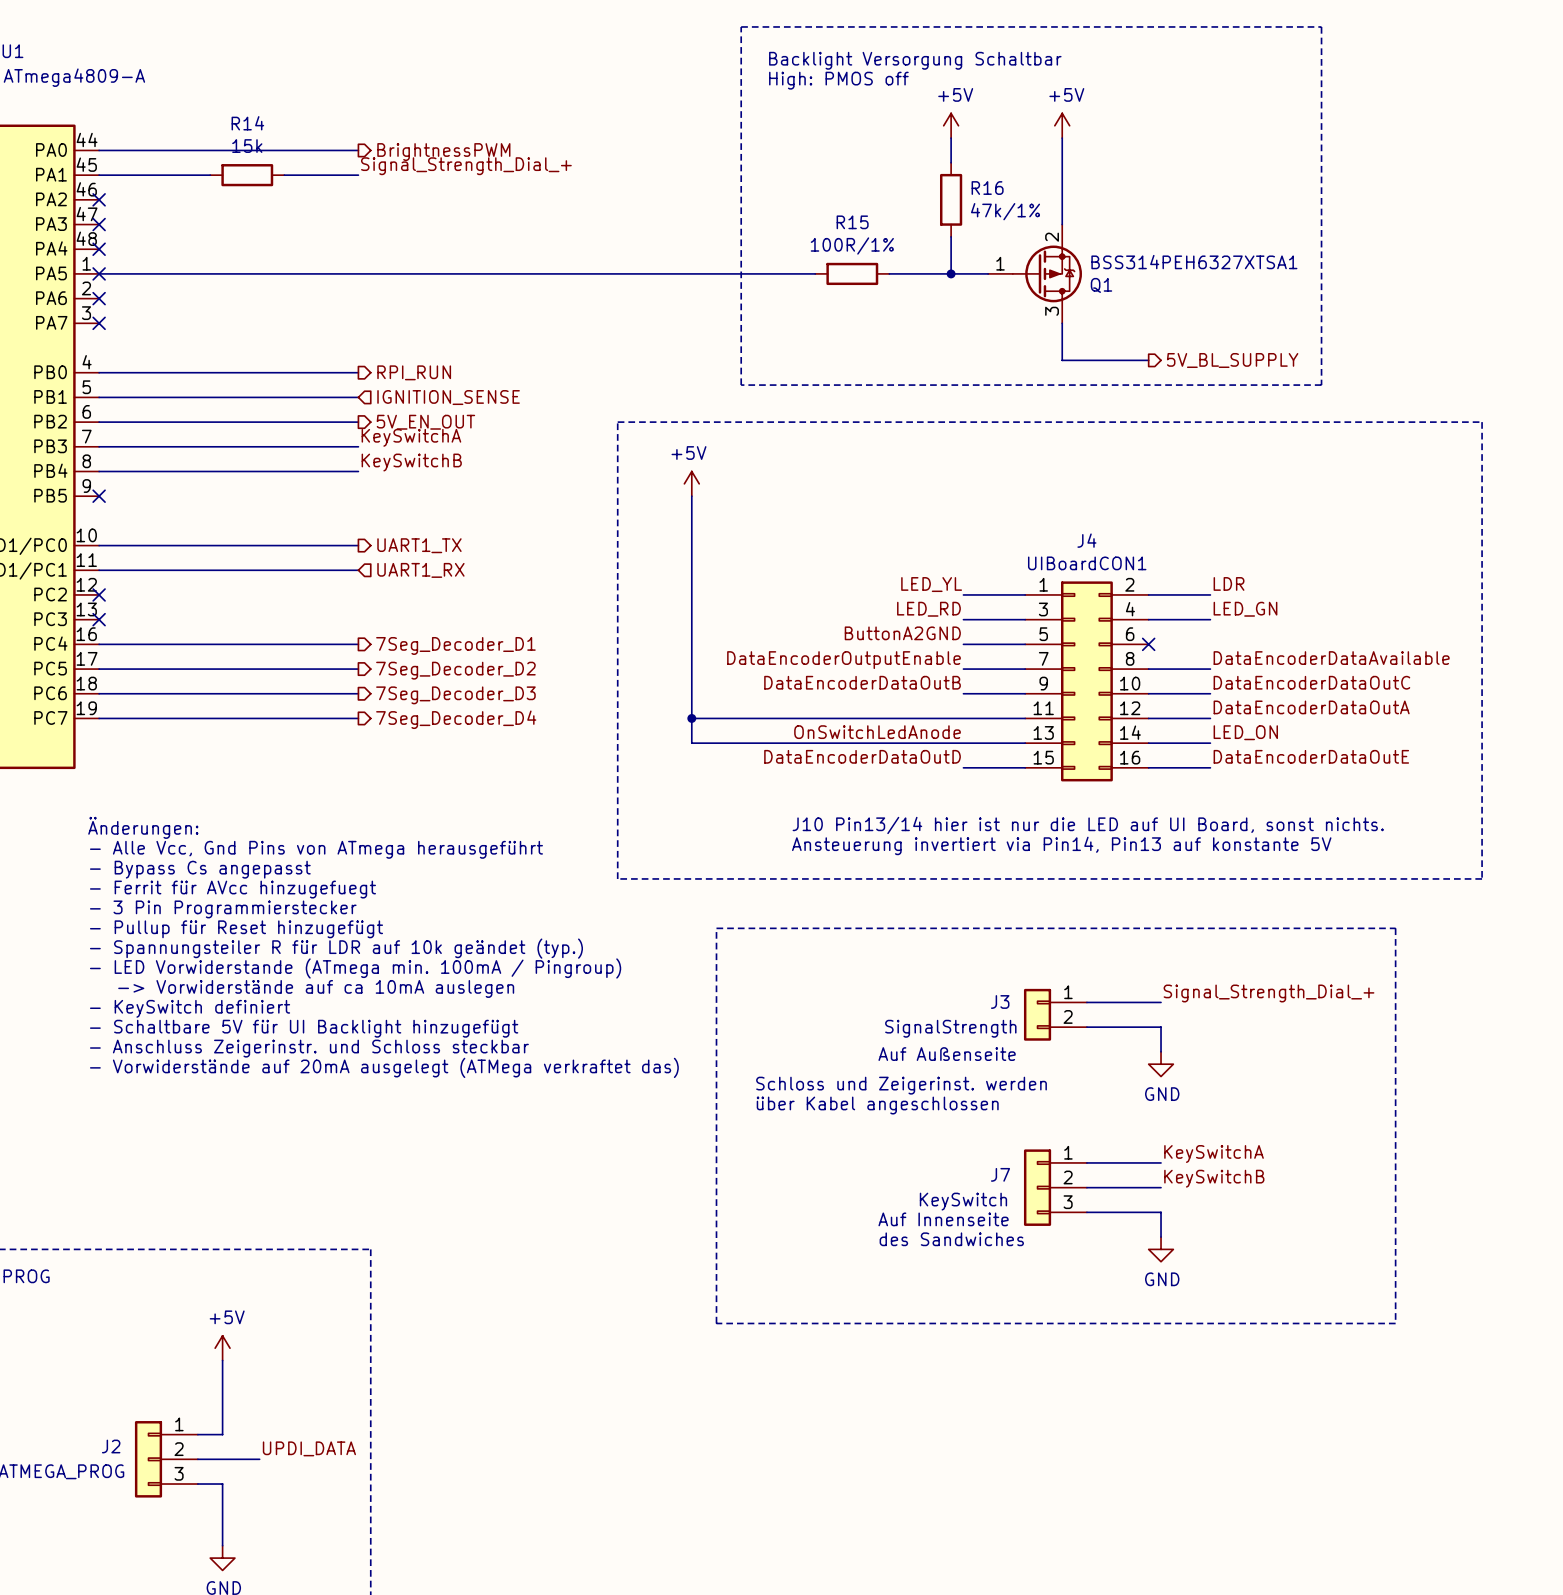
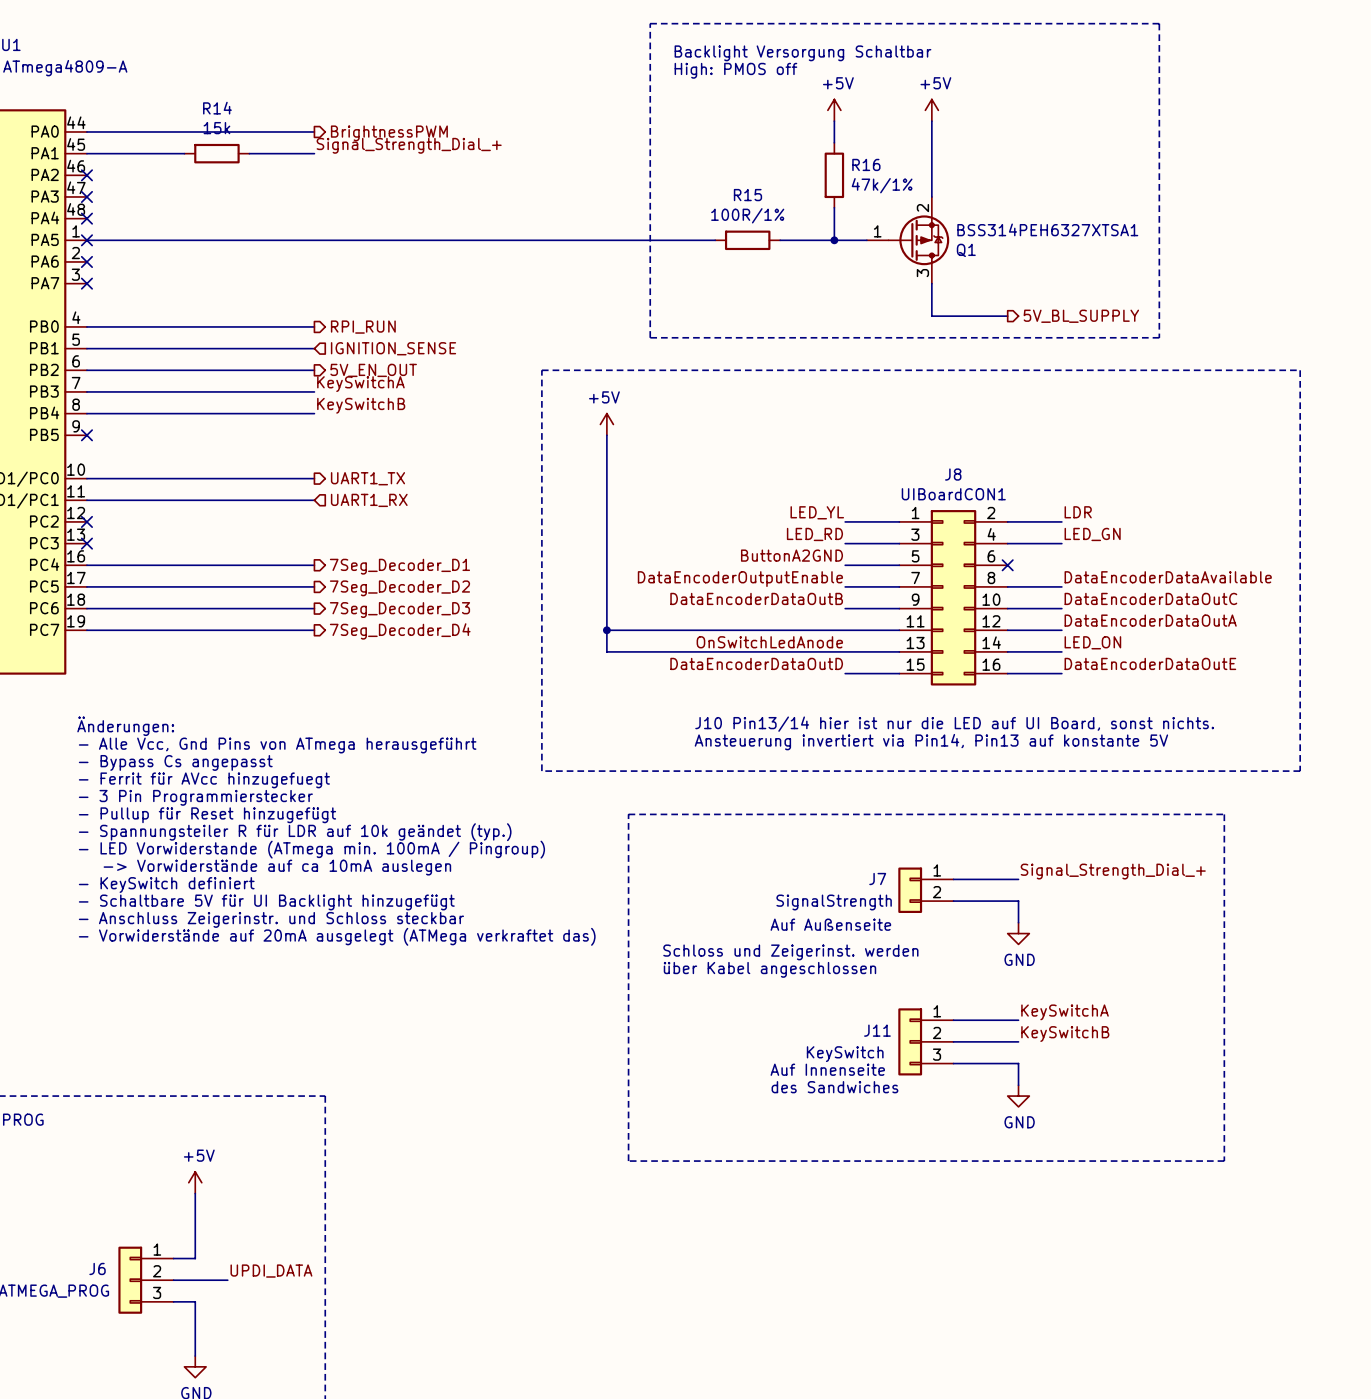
J4 name: J4 (1086, 540) -> J8 (953, 474)
J3 name: J3 (1000, 1001) -> J7 (877, 879)
J7 name: J7 (1000, 1174) -> J11 (877, 1030)
J2 name: J2 (111, 1446) -> J6 (97, 1268)

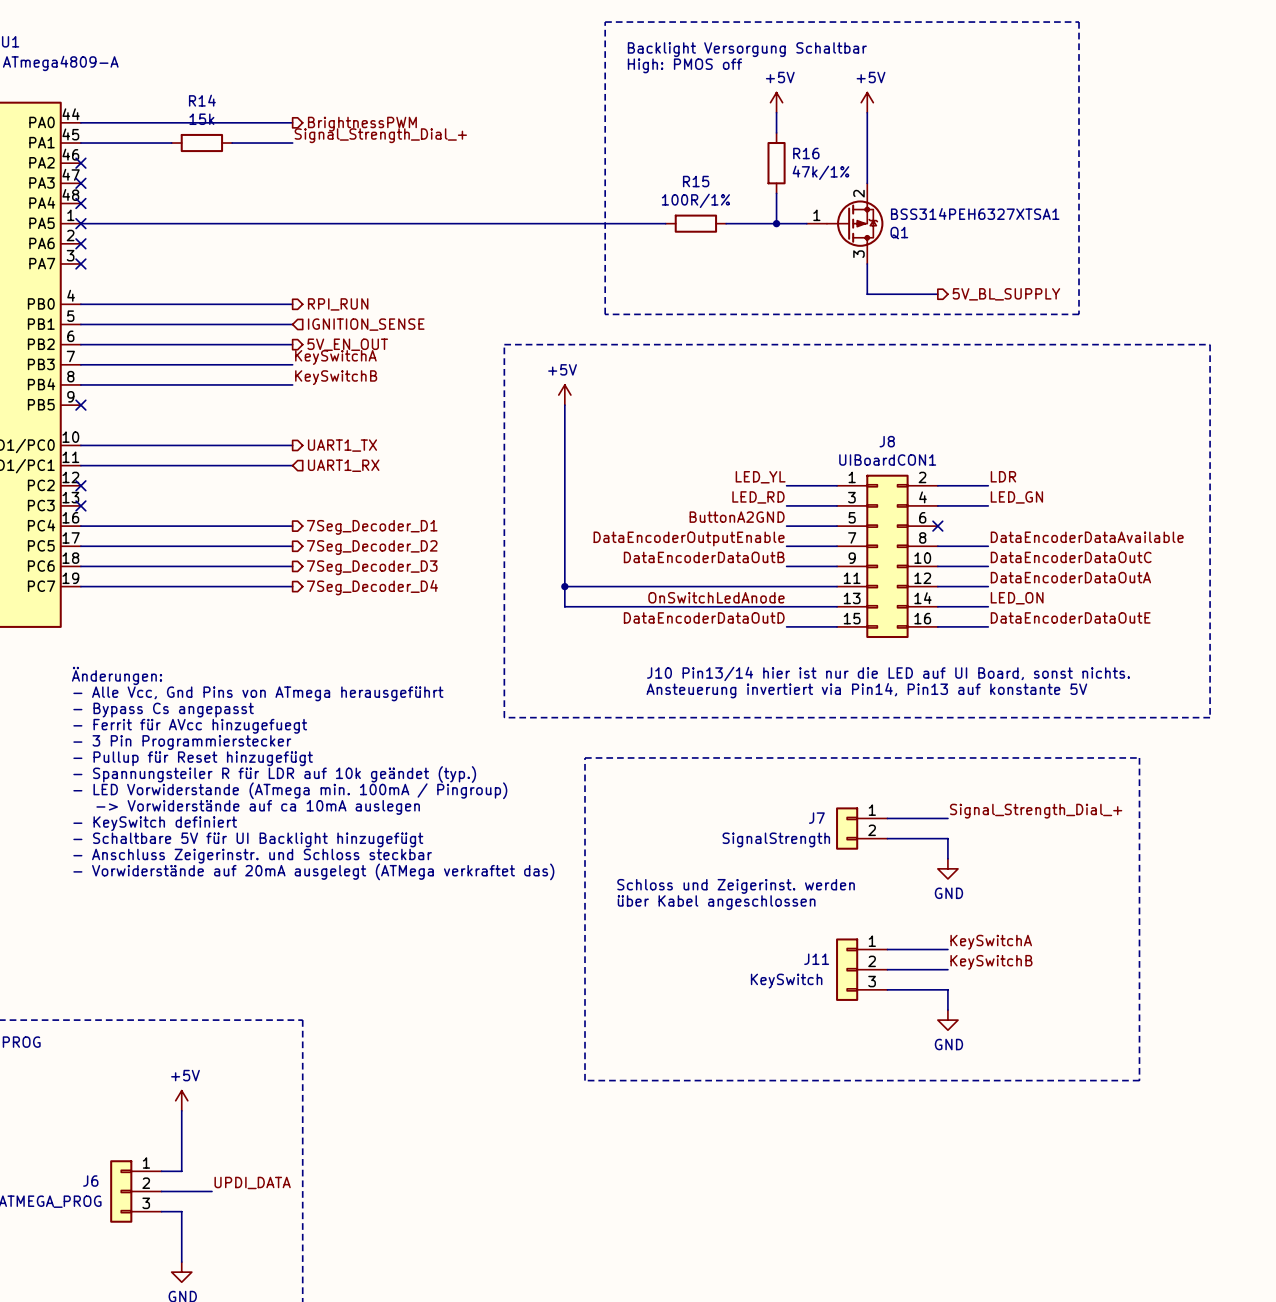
text: Auf Außenseite (830, 924) -> none
text: Auf Innenseite (827, 1069) -> none
text: des Sandwiches (834, 1087) -> none

